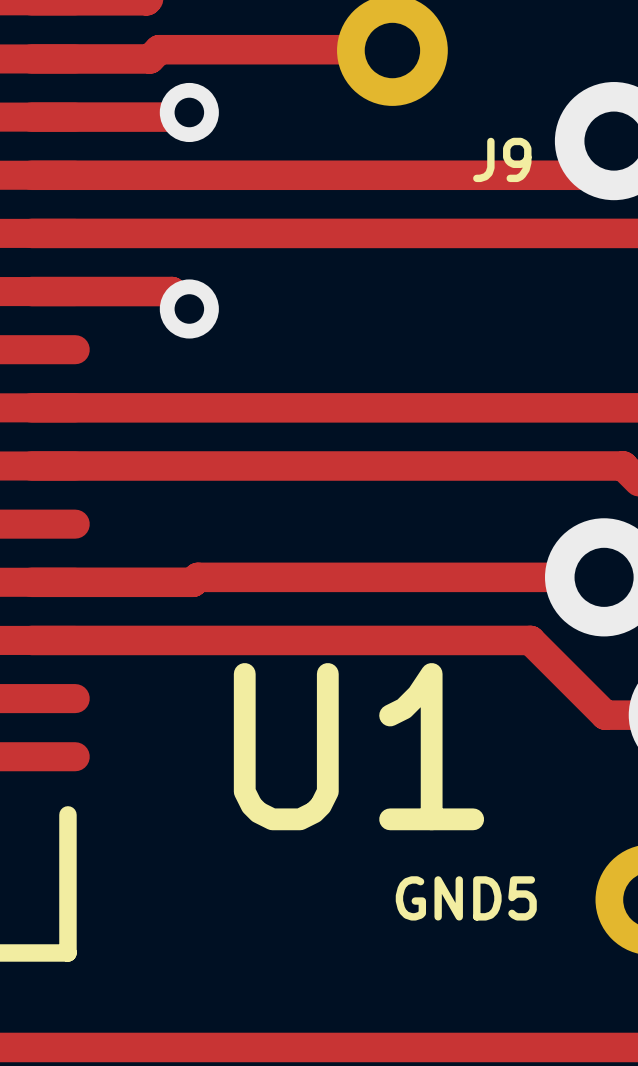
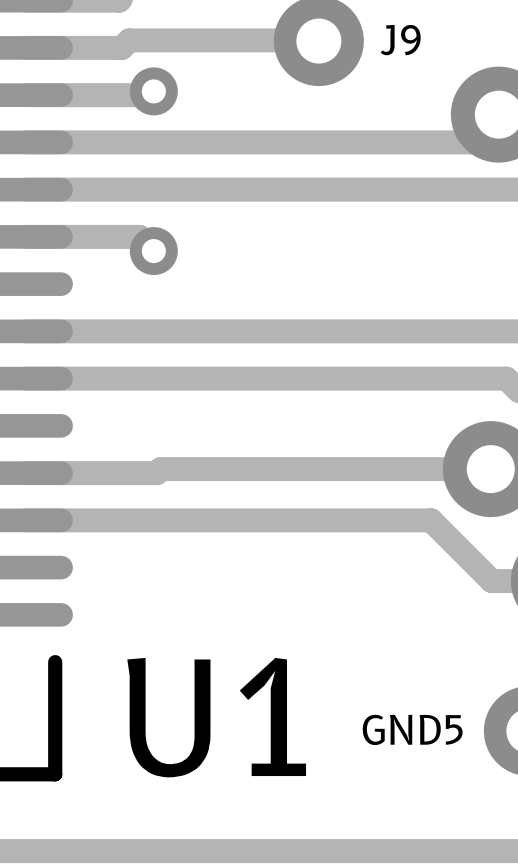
J9 name position: J9 (502, 159) -> J9 (400, 40)
U1 name position: U1 (358, 746) -> U1 (216, 717)
GND5 name position: GND5 (466, 898) -> GND5 (412, 729)

